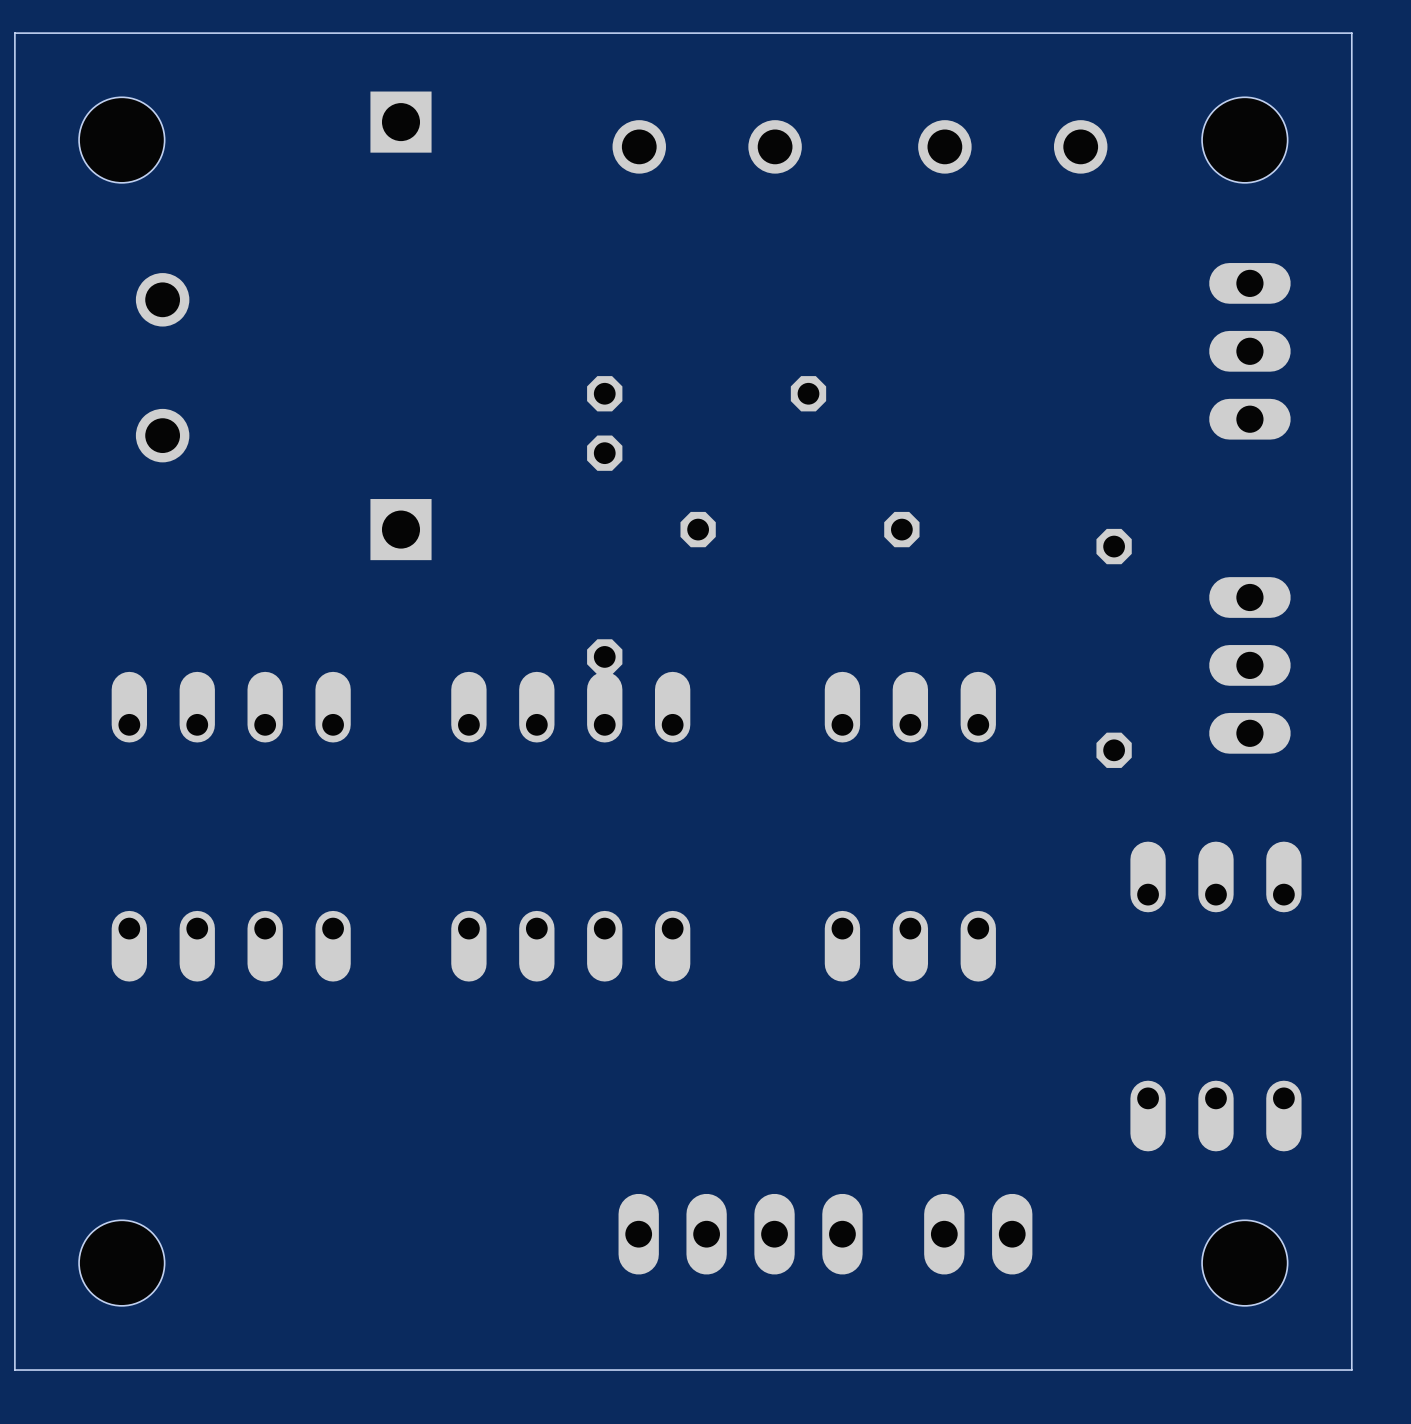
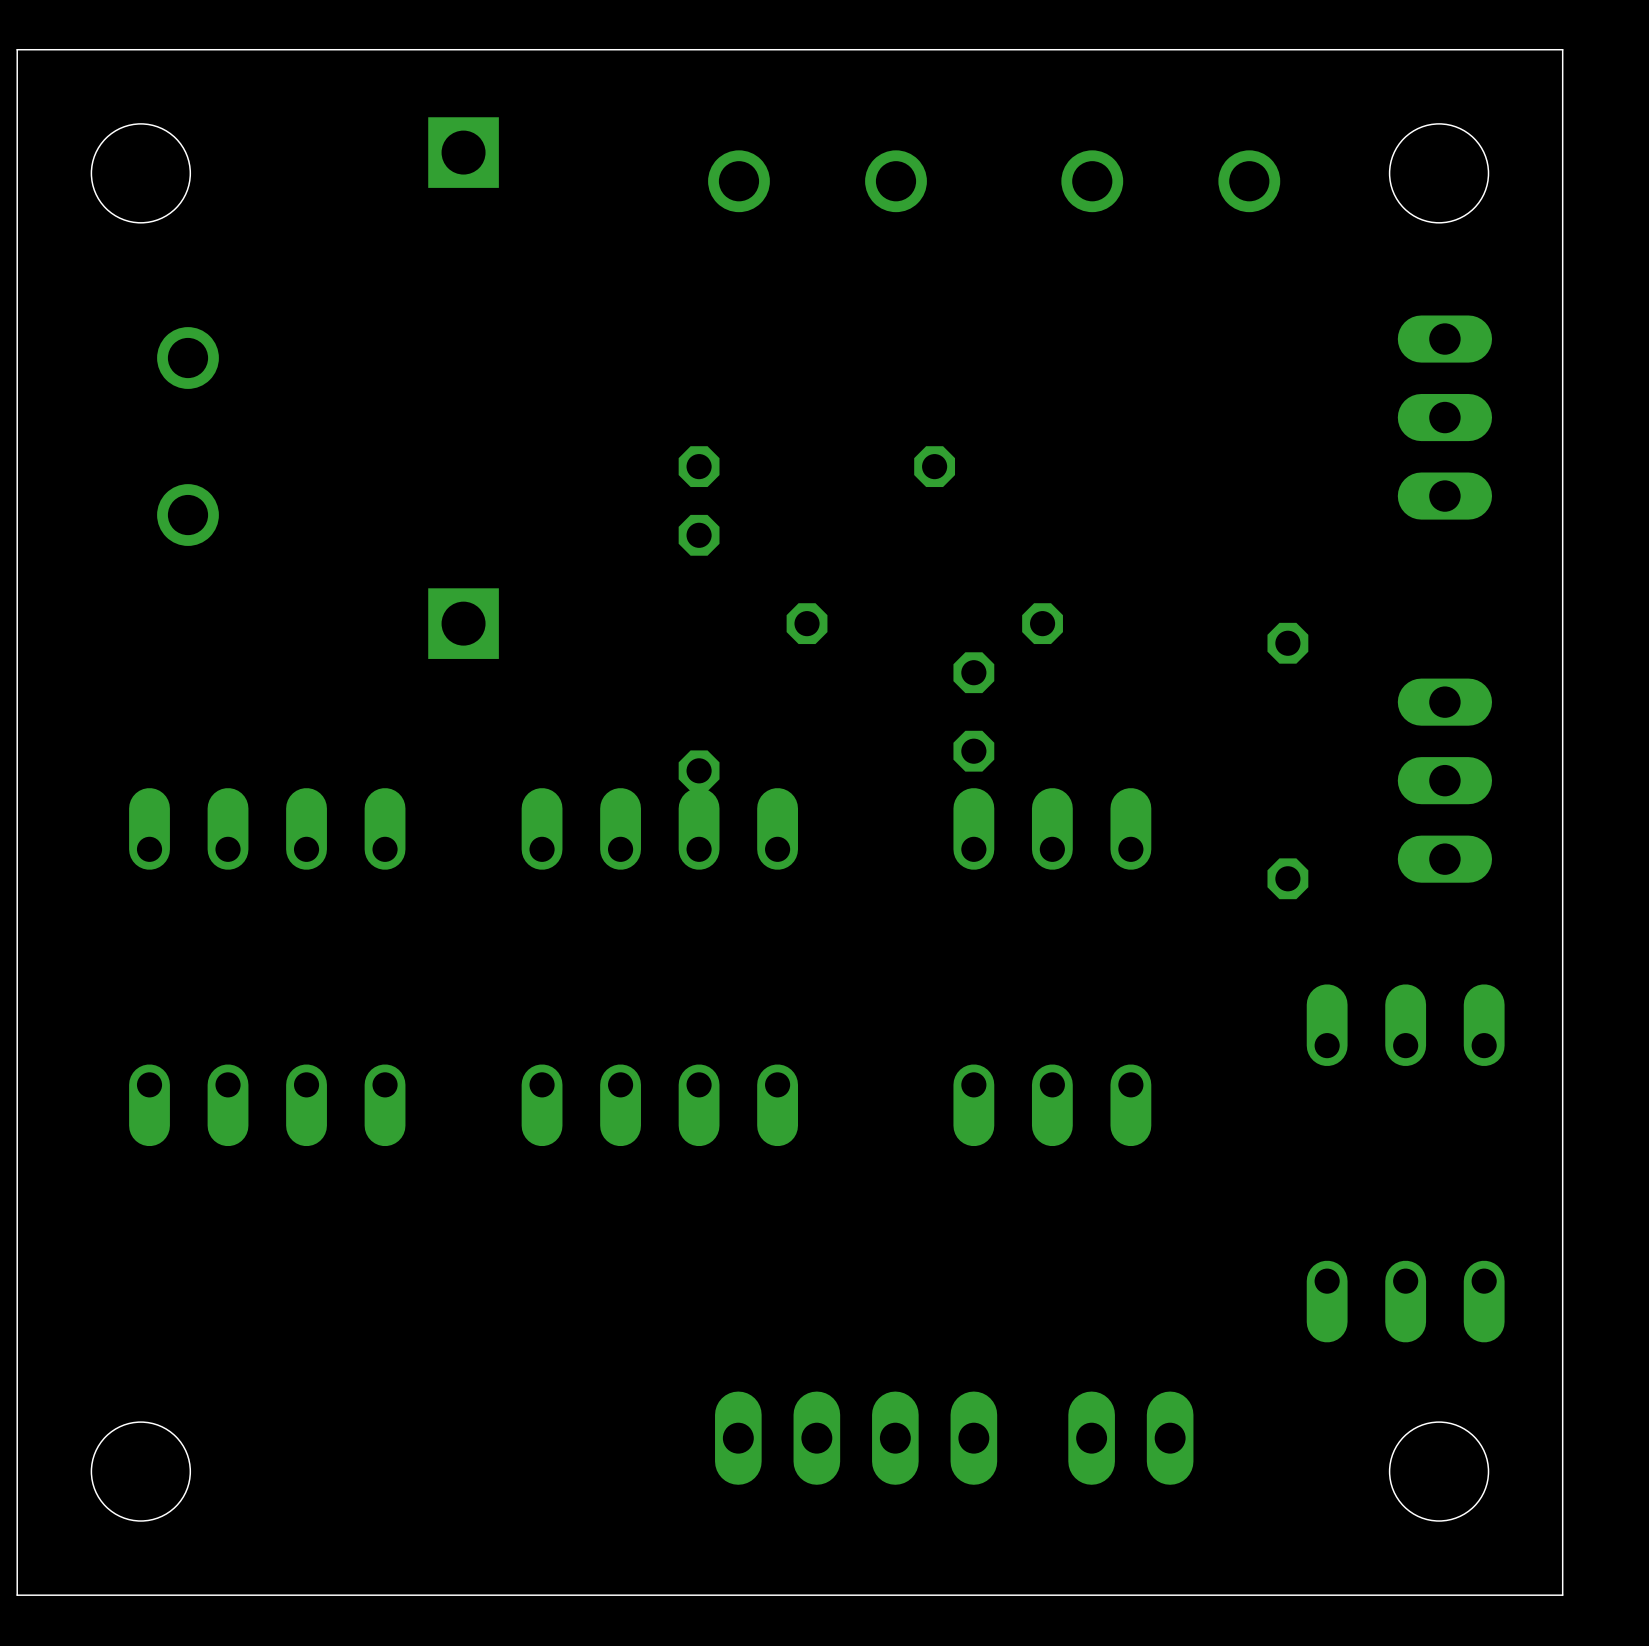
part: none -> (973, 711)

